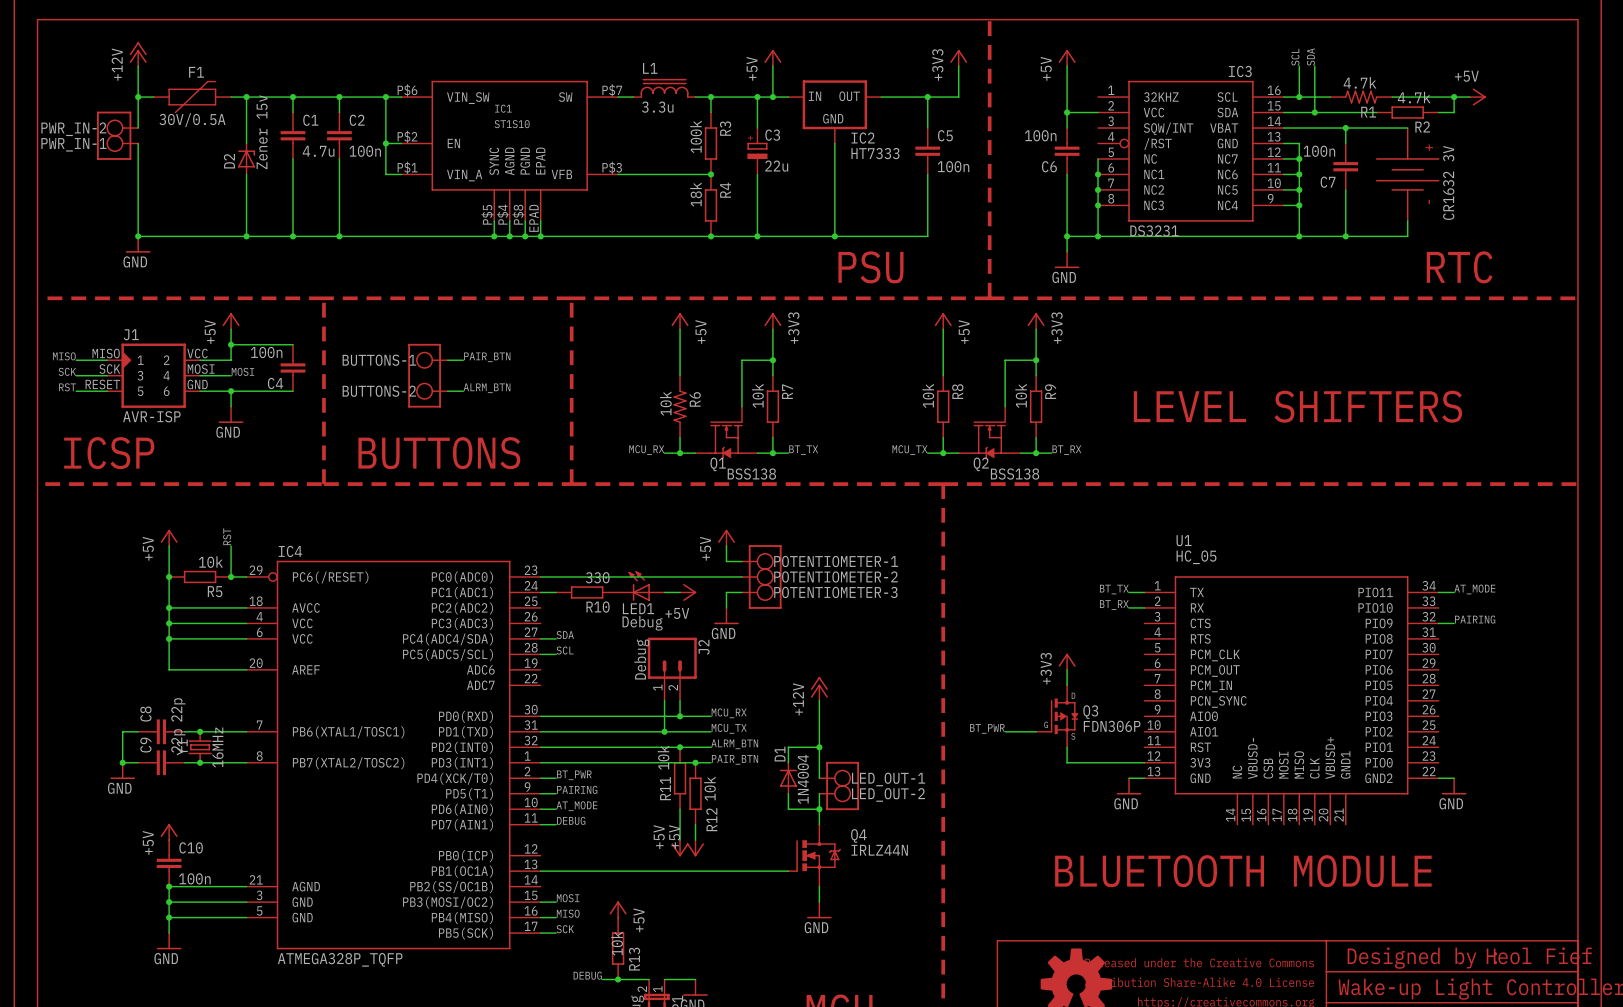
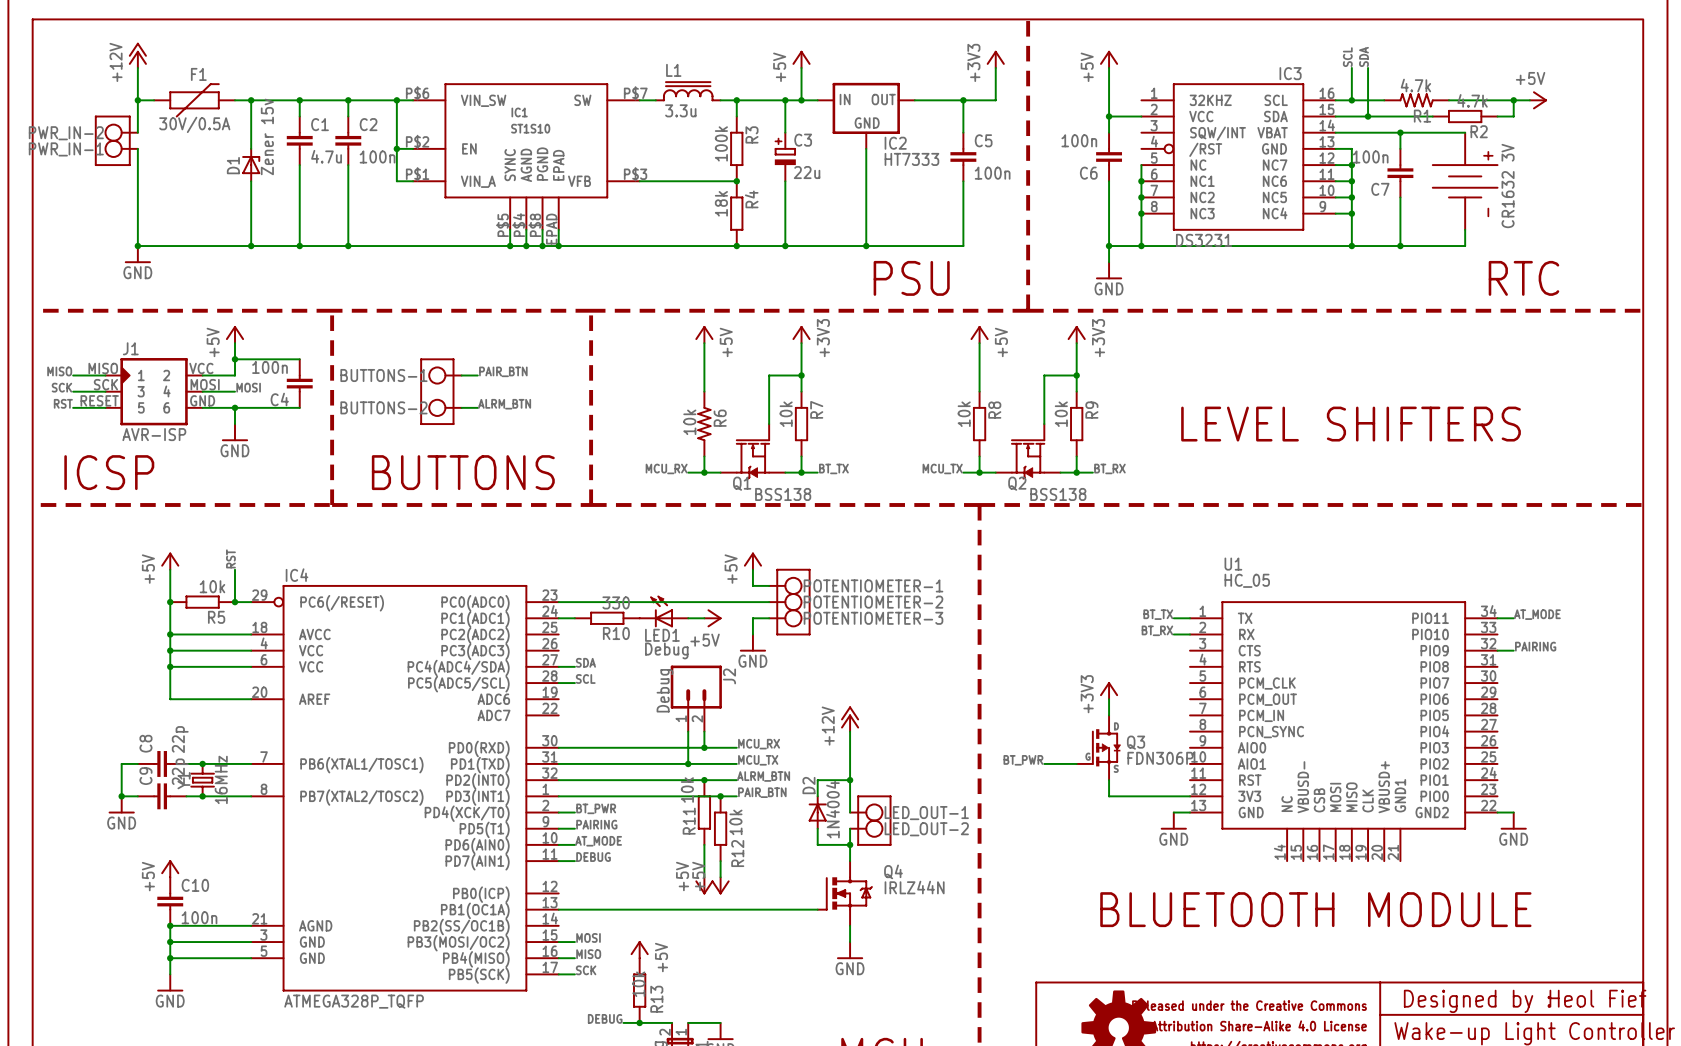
D2 name: D2 (229, 161) -> D1 (233, 165)
D1 name: D1 (780, 754) -> D2 (808, 785)

